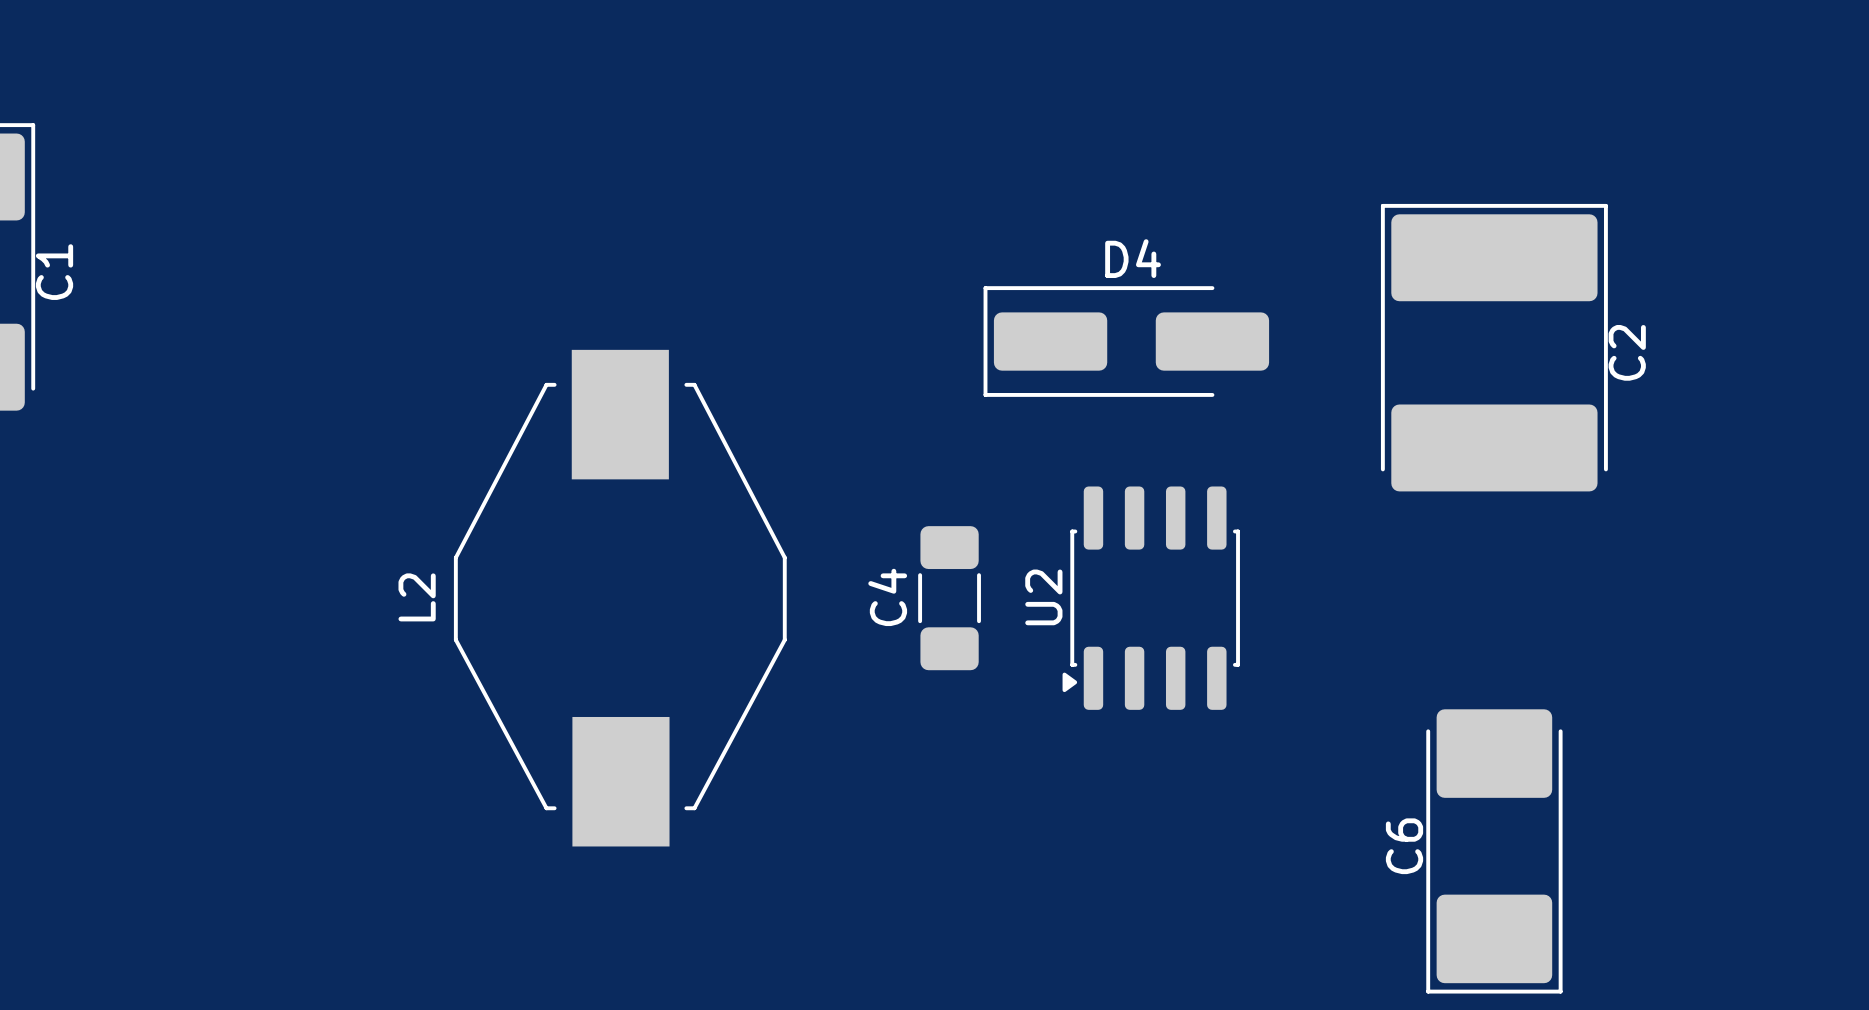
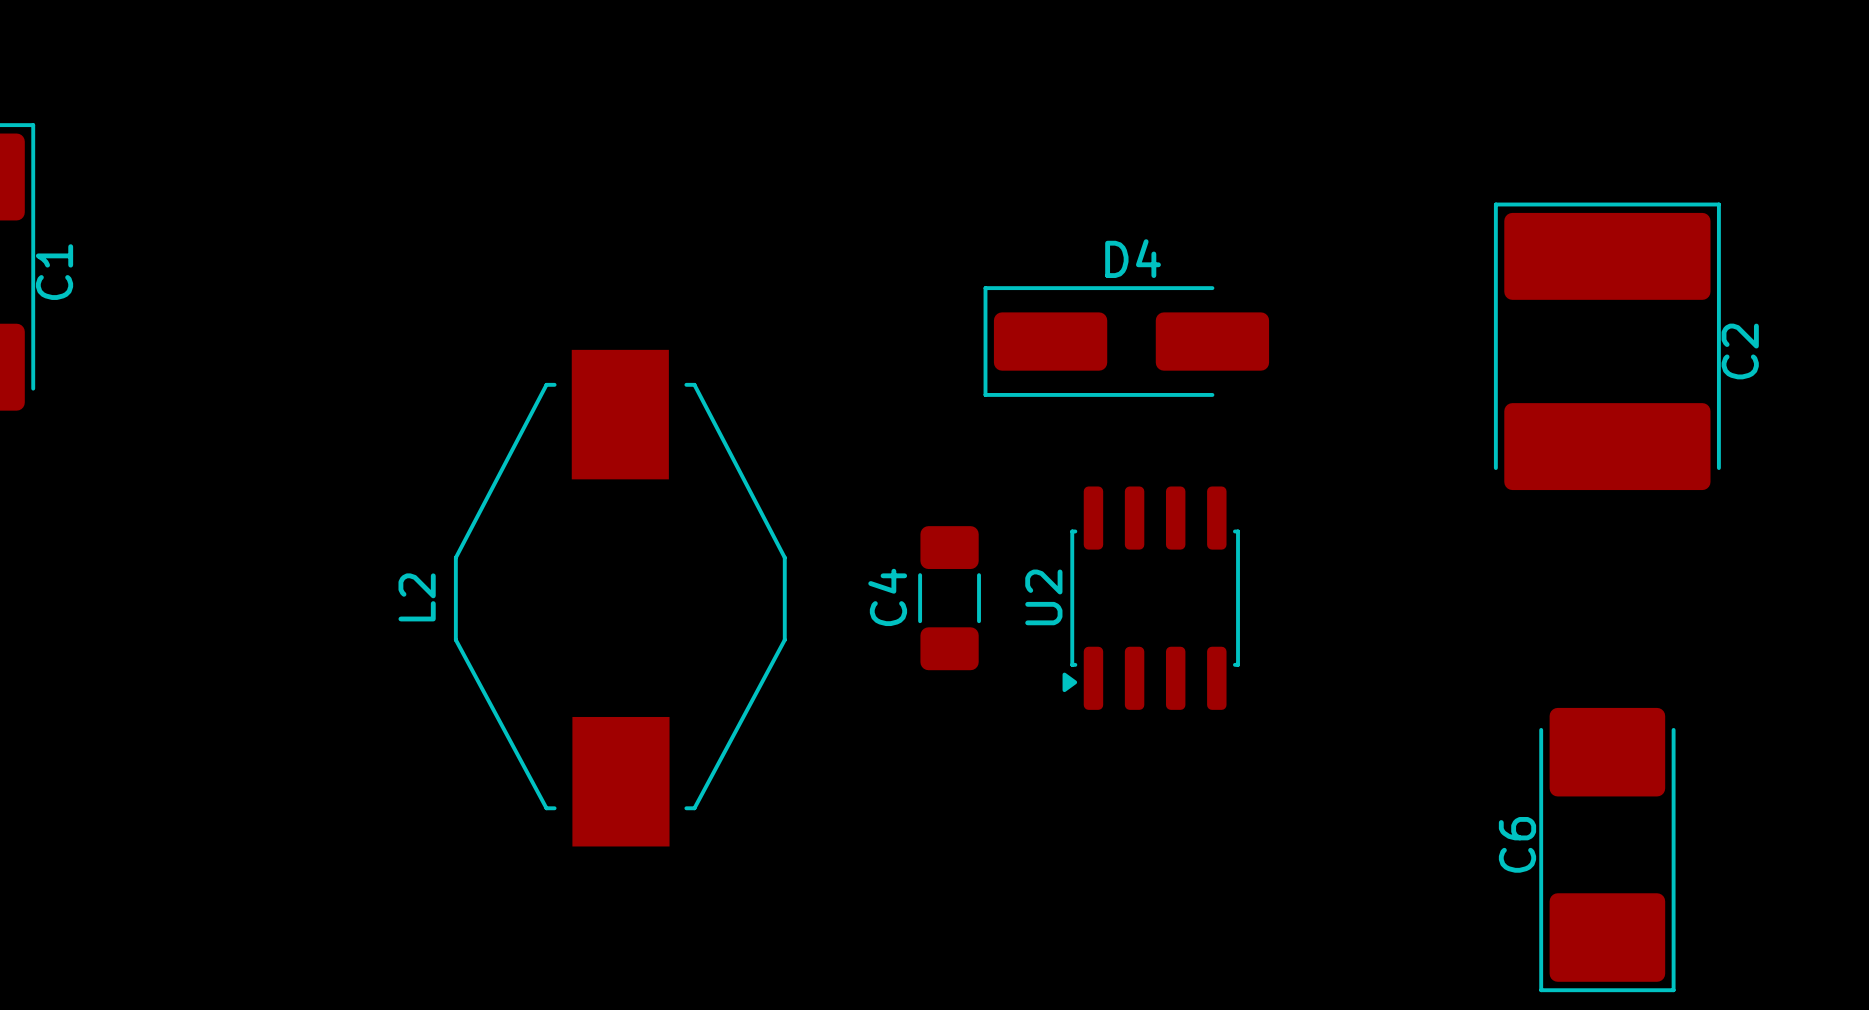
C2 position: (1494, 347) -> (1607, 346)
C6 position: (1494, 851) -> (1607, 850)

